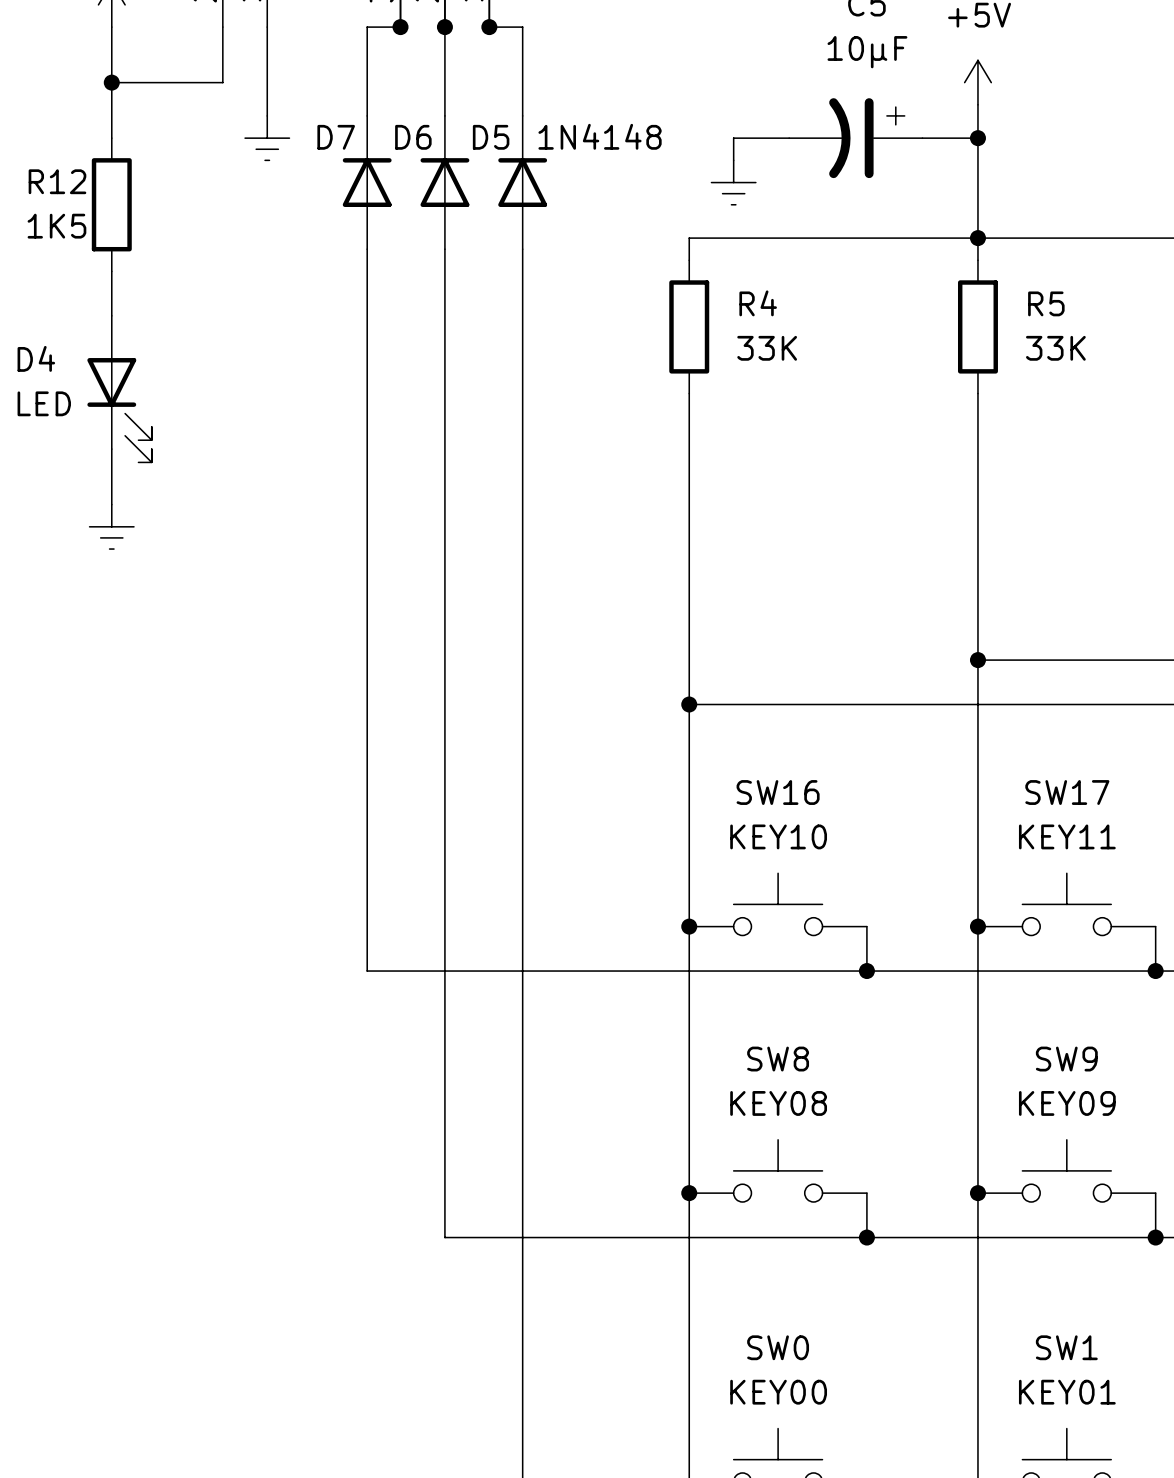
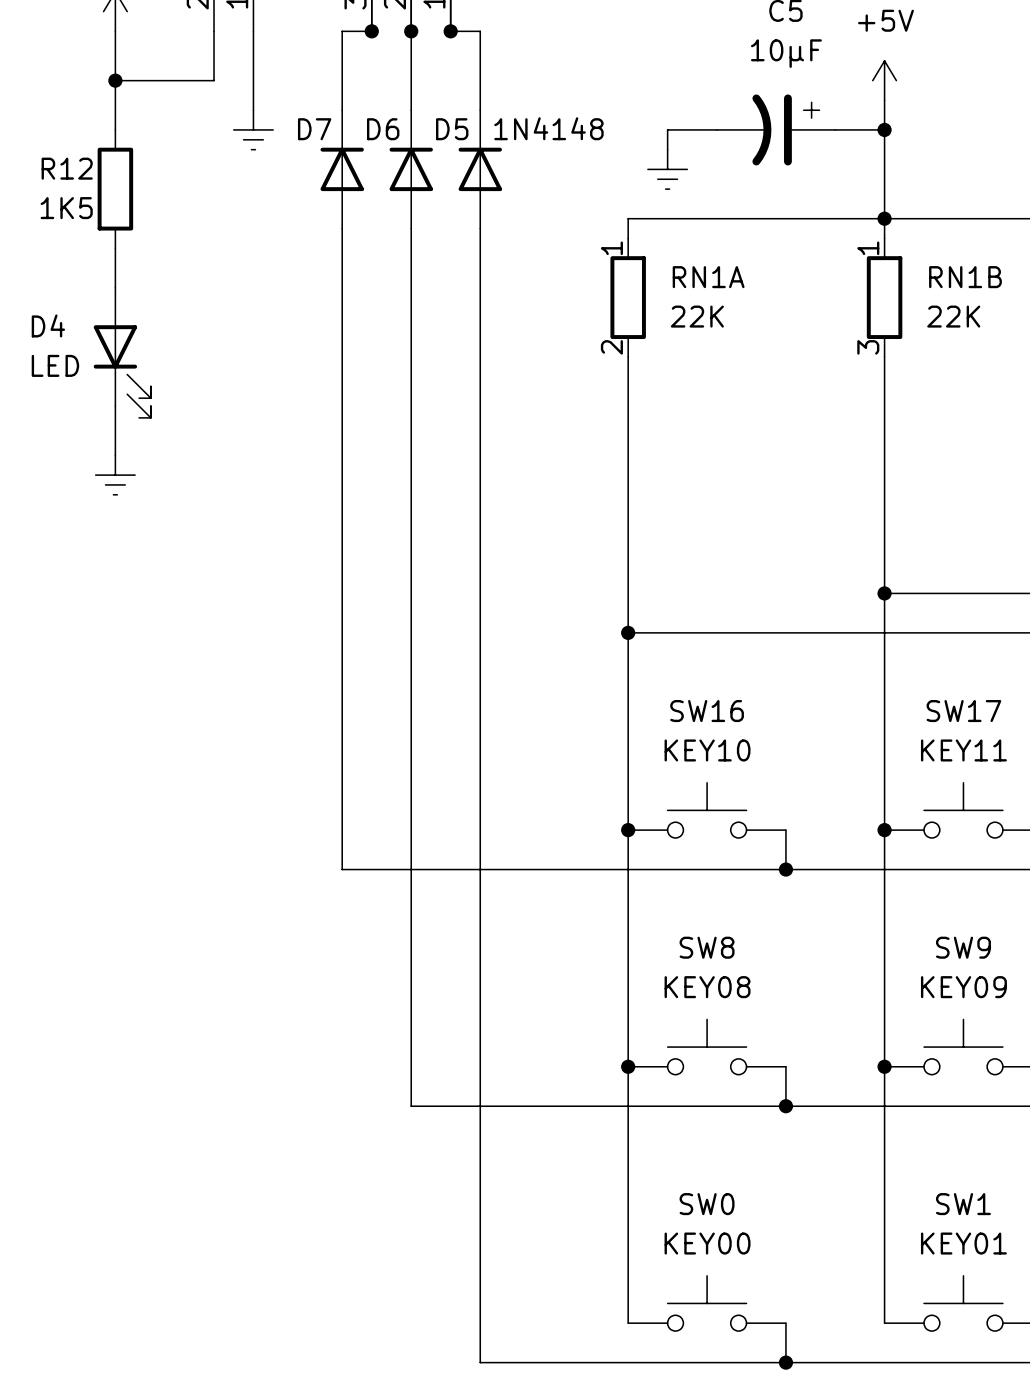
R4 pin number: none -> 1 (611, 248)
R5 pin number: none -> 1 (868, 248)
R4 name: R4 (758, 303) -> RN1A (708, 277)
R5 name: R5 (1046, 303) -> RN1B (965, 277)
R4 value: 33K (767, 348) -> 22K (697, 316)
R5 value: 33K (1055, 348) -> 22K (953, 316)
R4 pin number: none -> 2 (611, 347)
R5 pin number: none -> 3 (868, 347)

